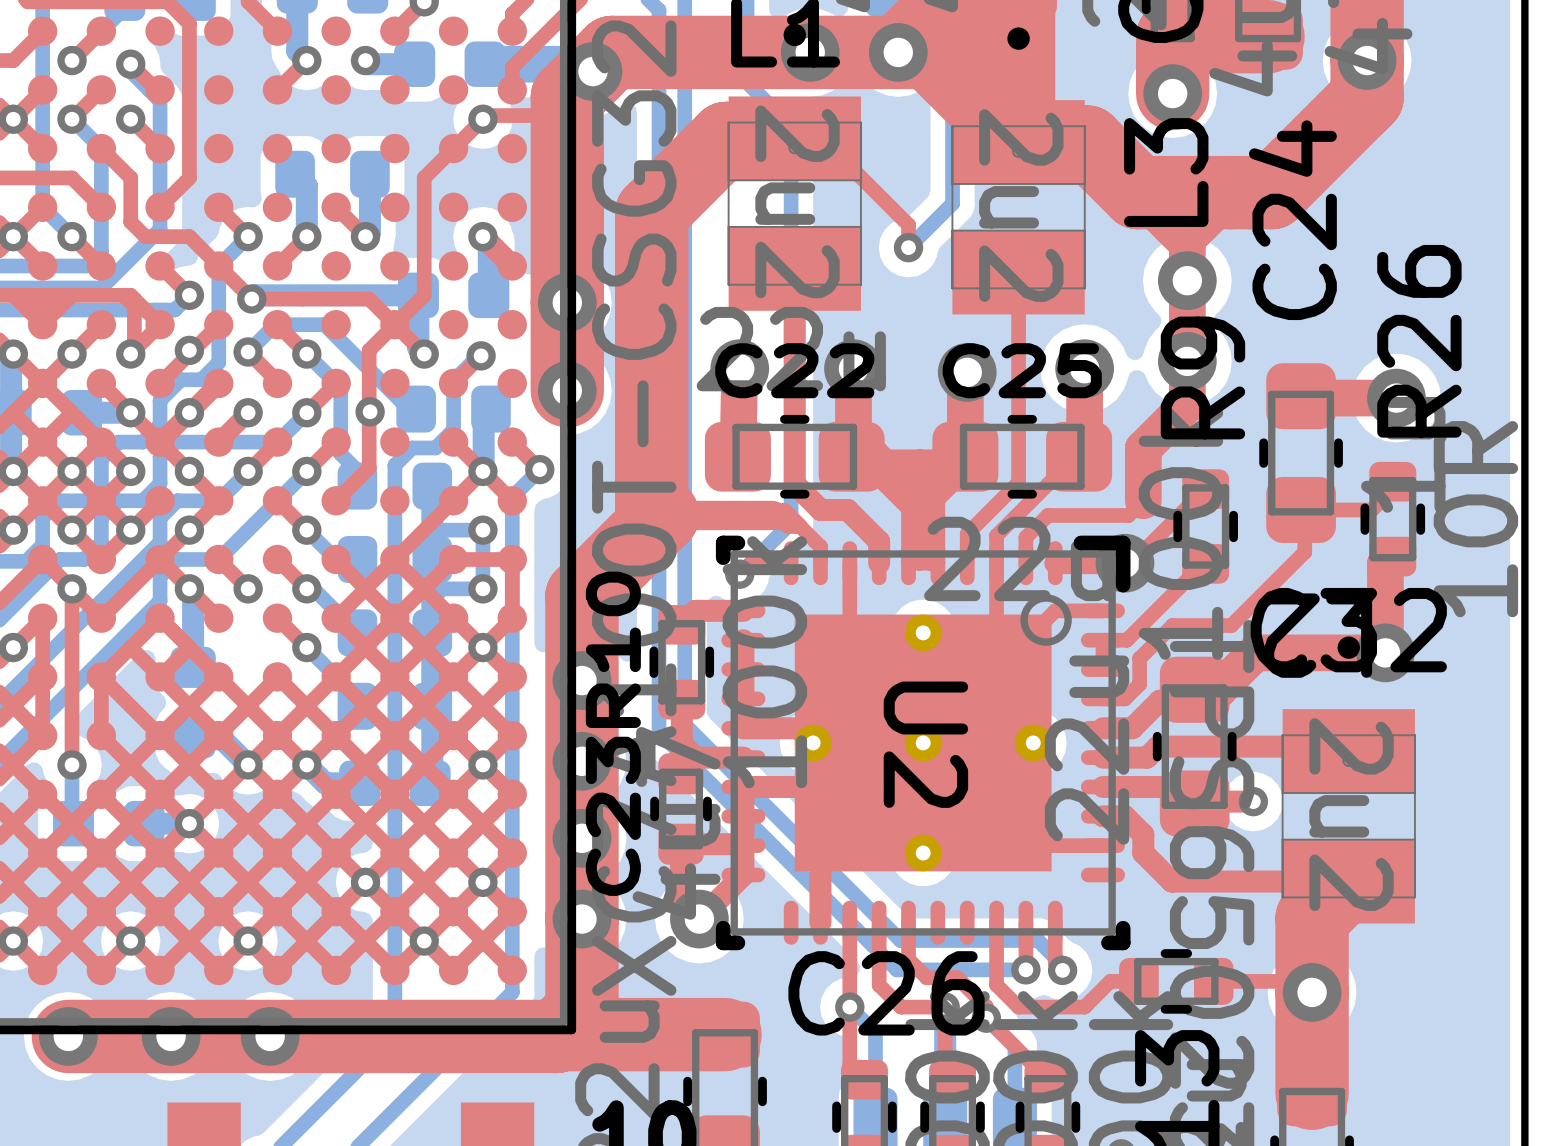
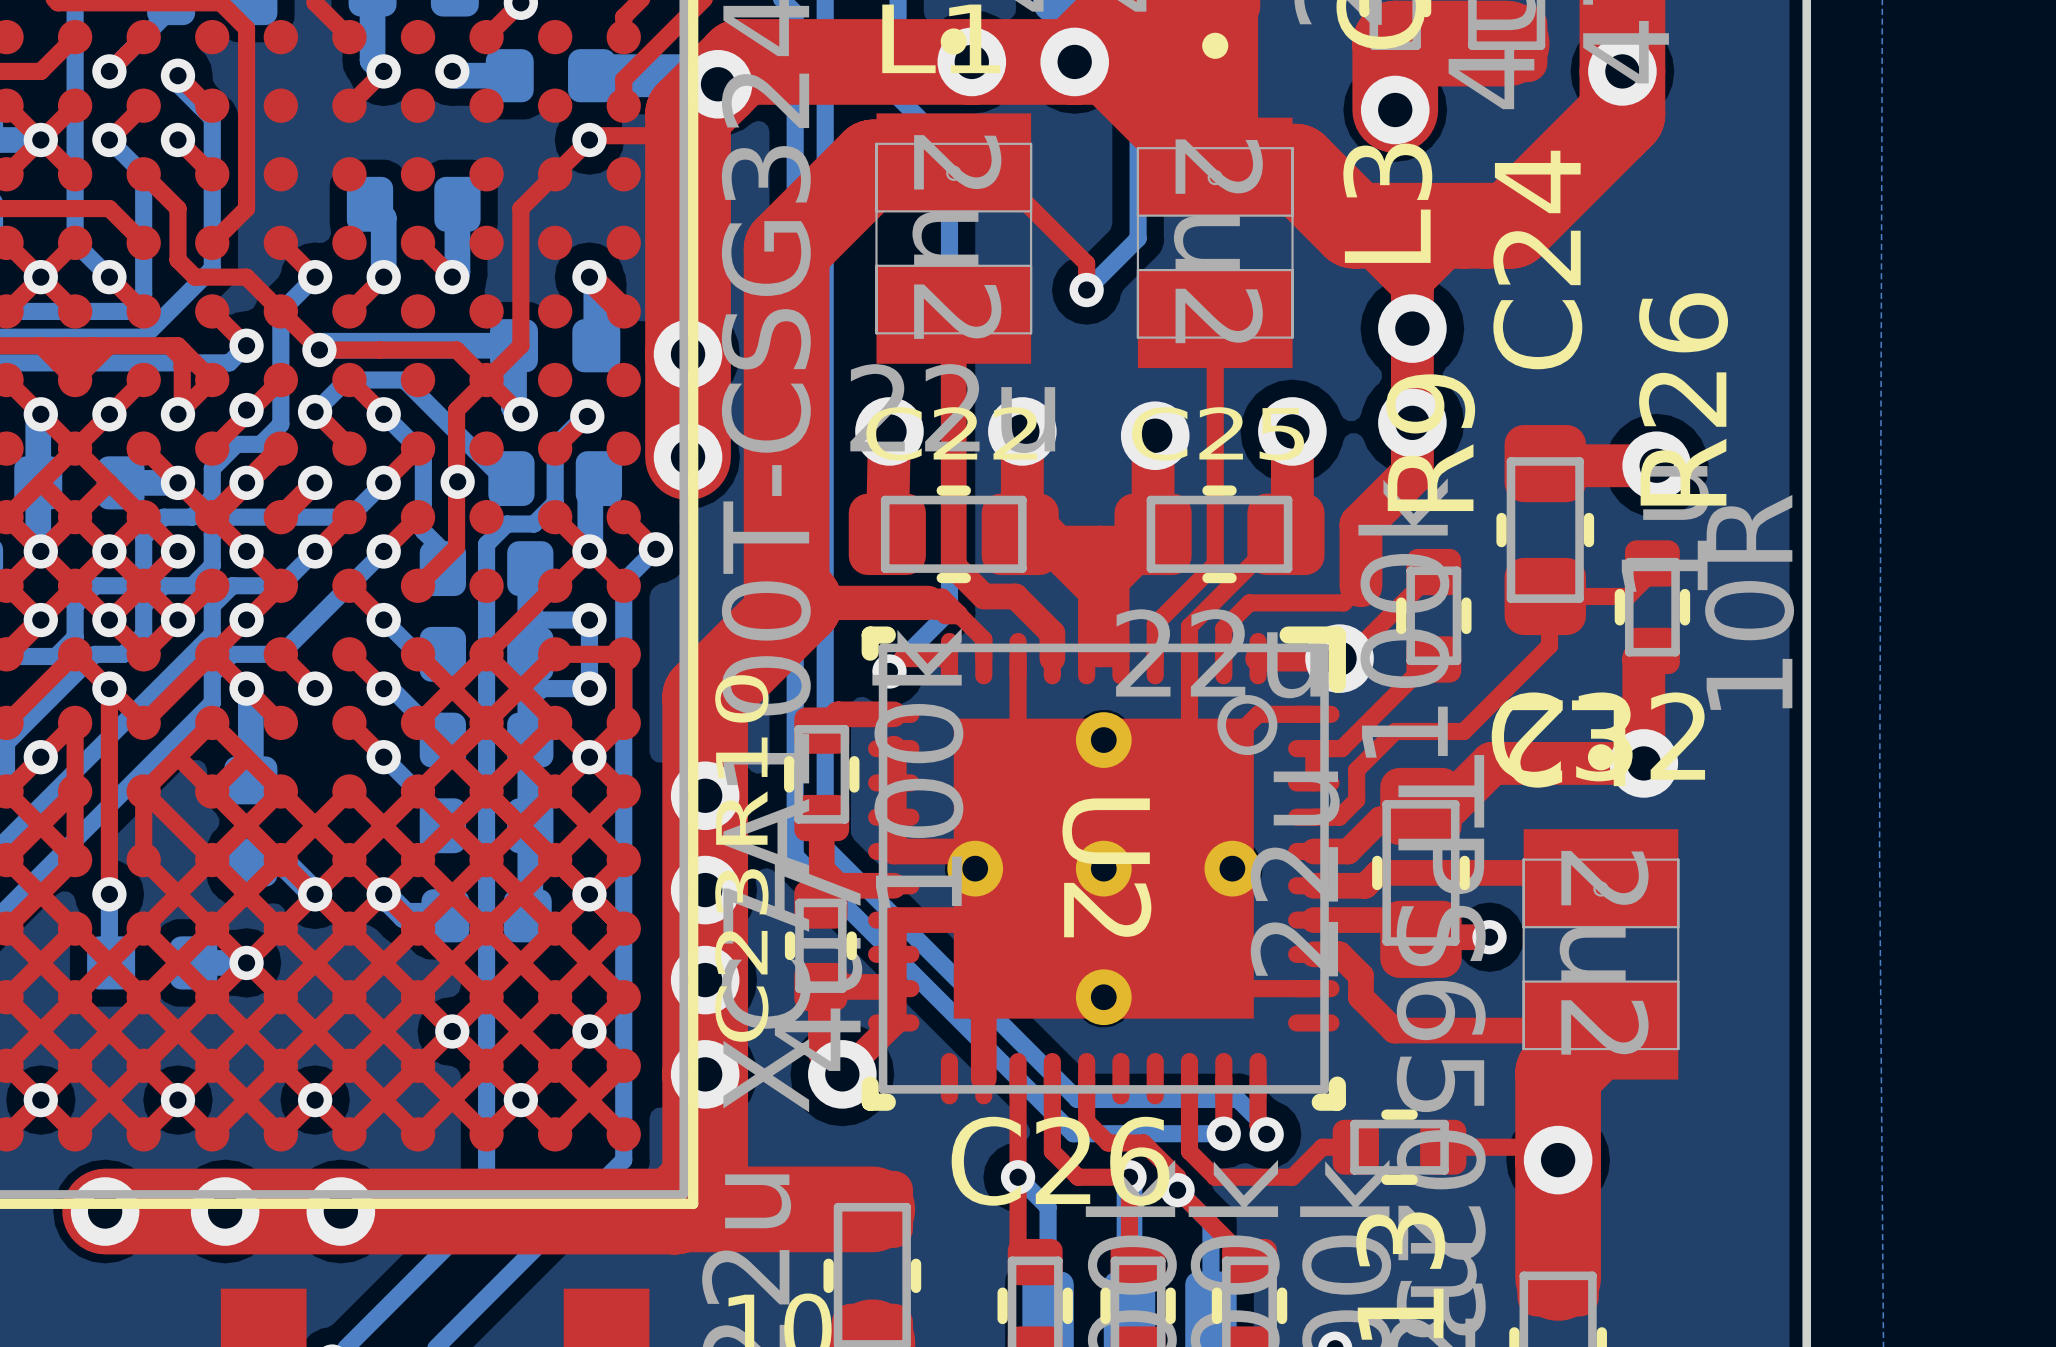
U2 footprint: [715, 535, 1131, 951] -> [861, 626, 1346, 1111]

